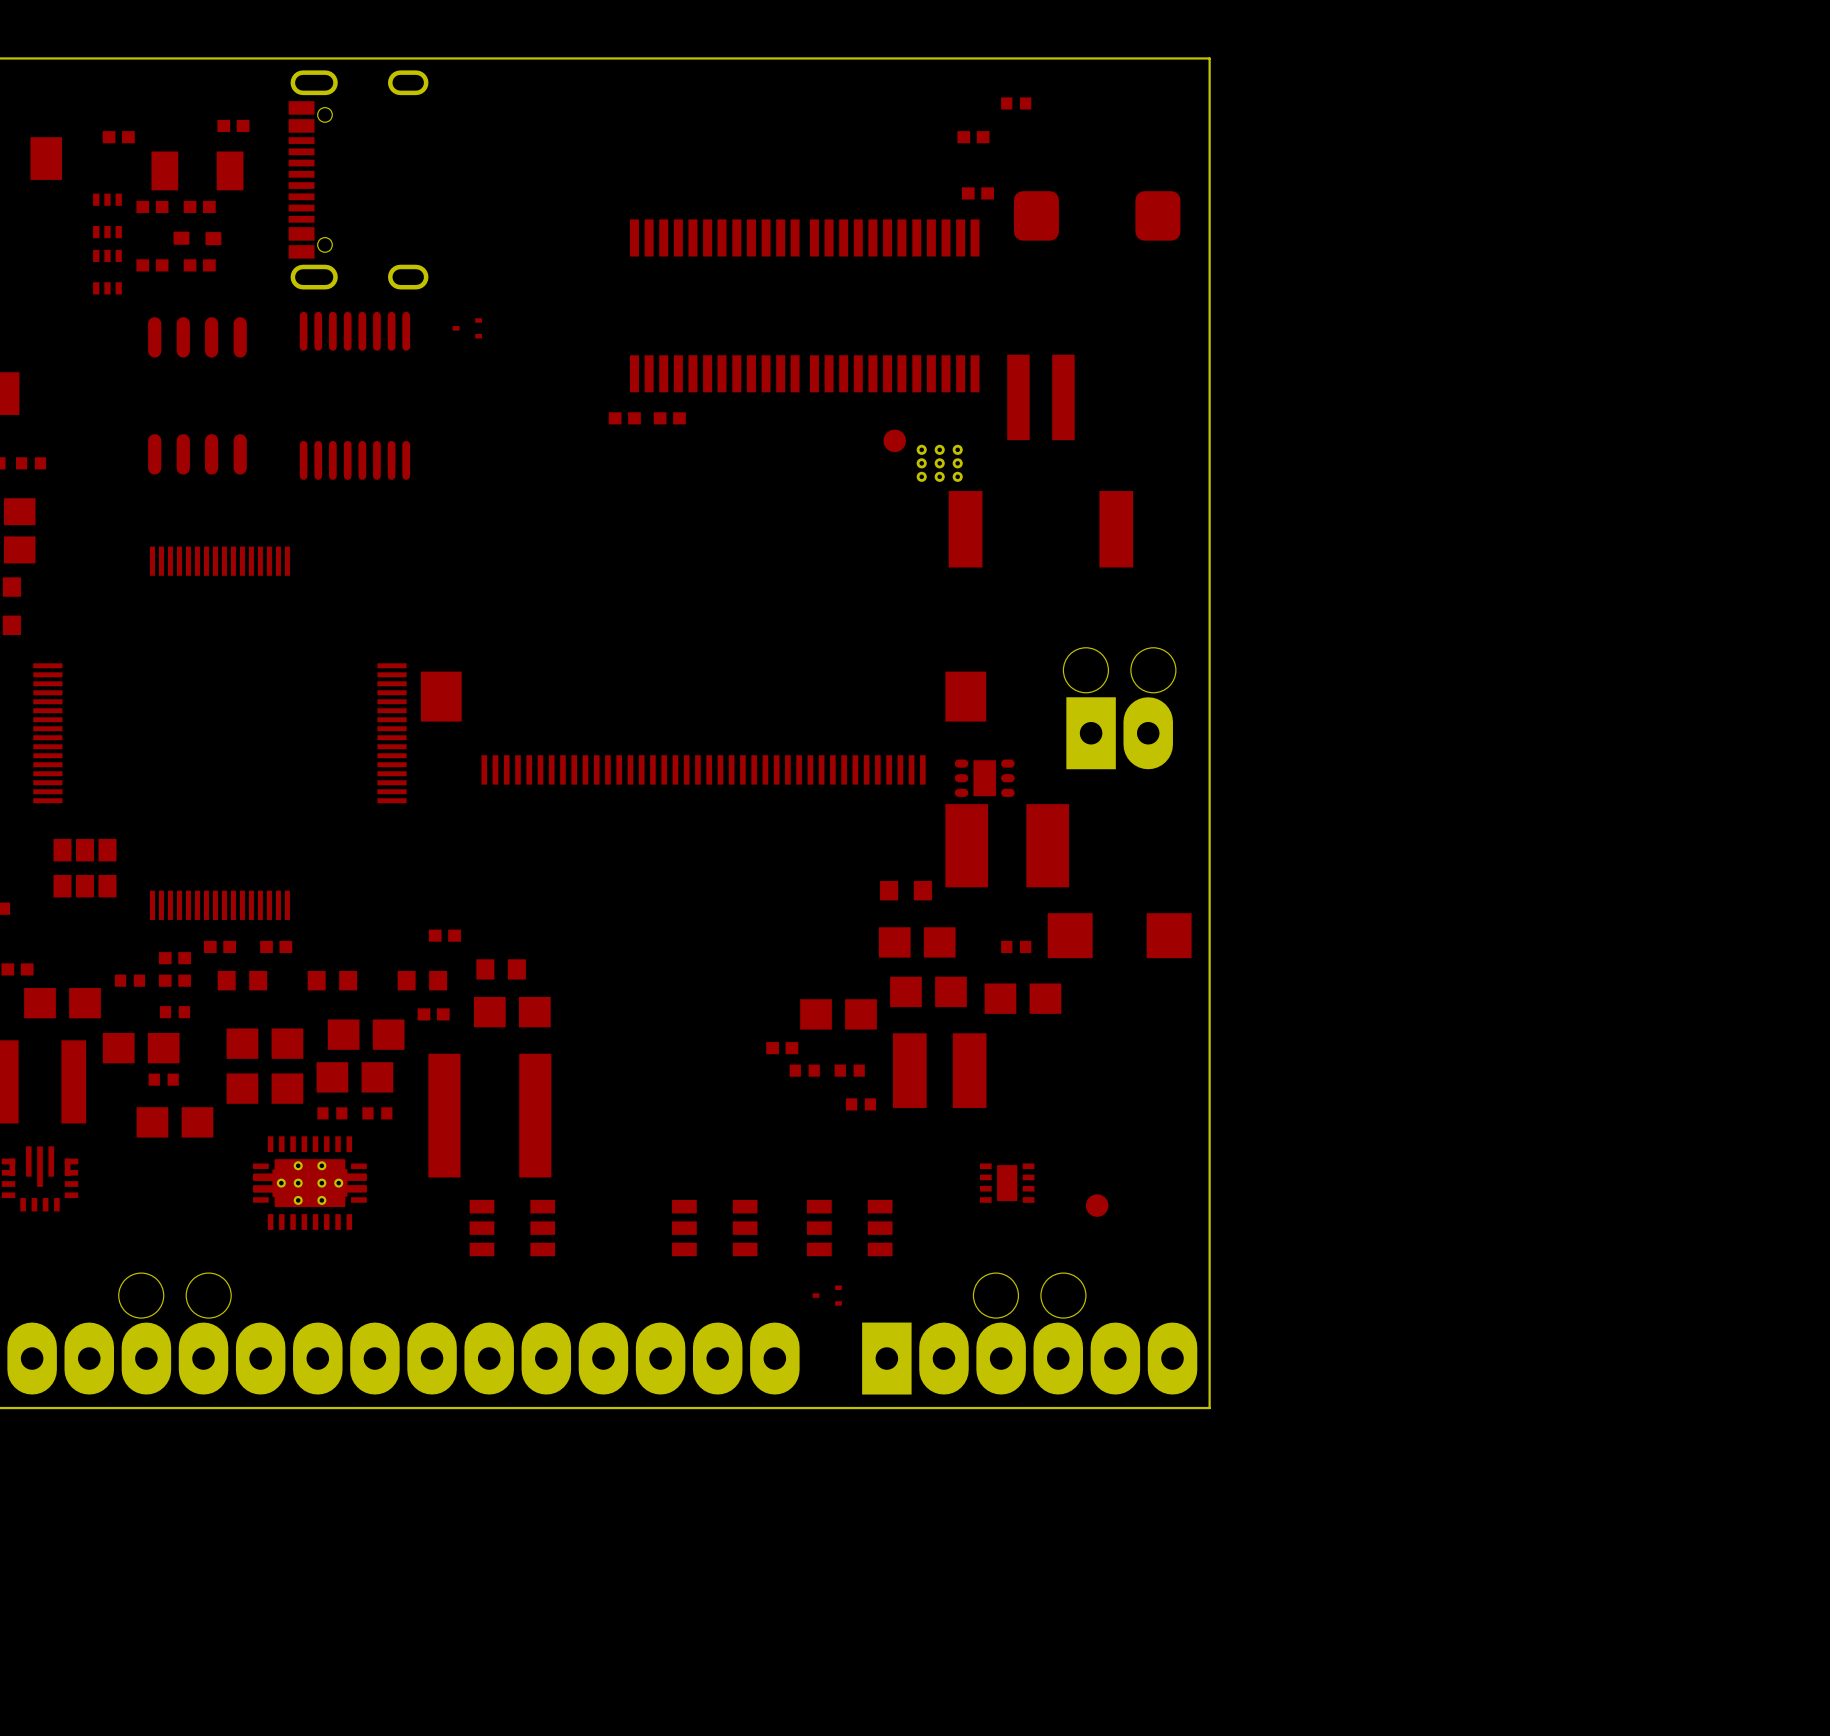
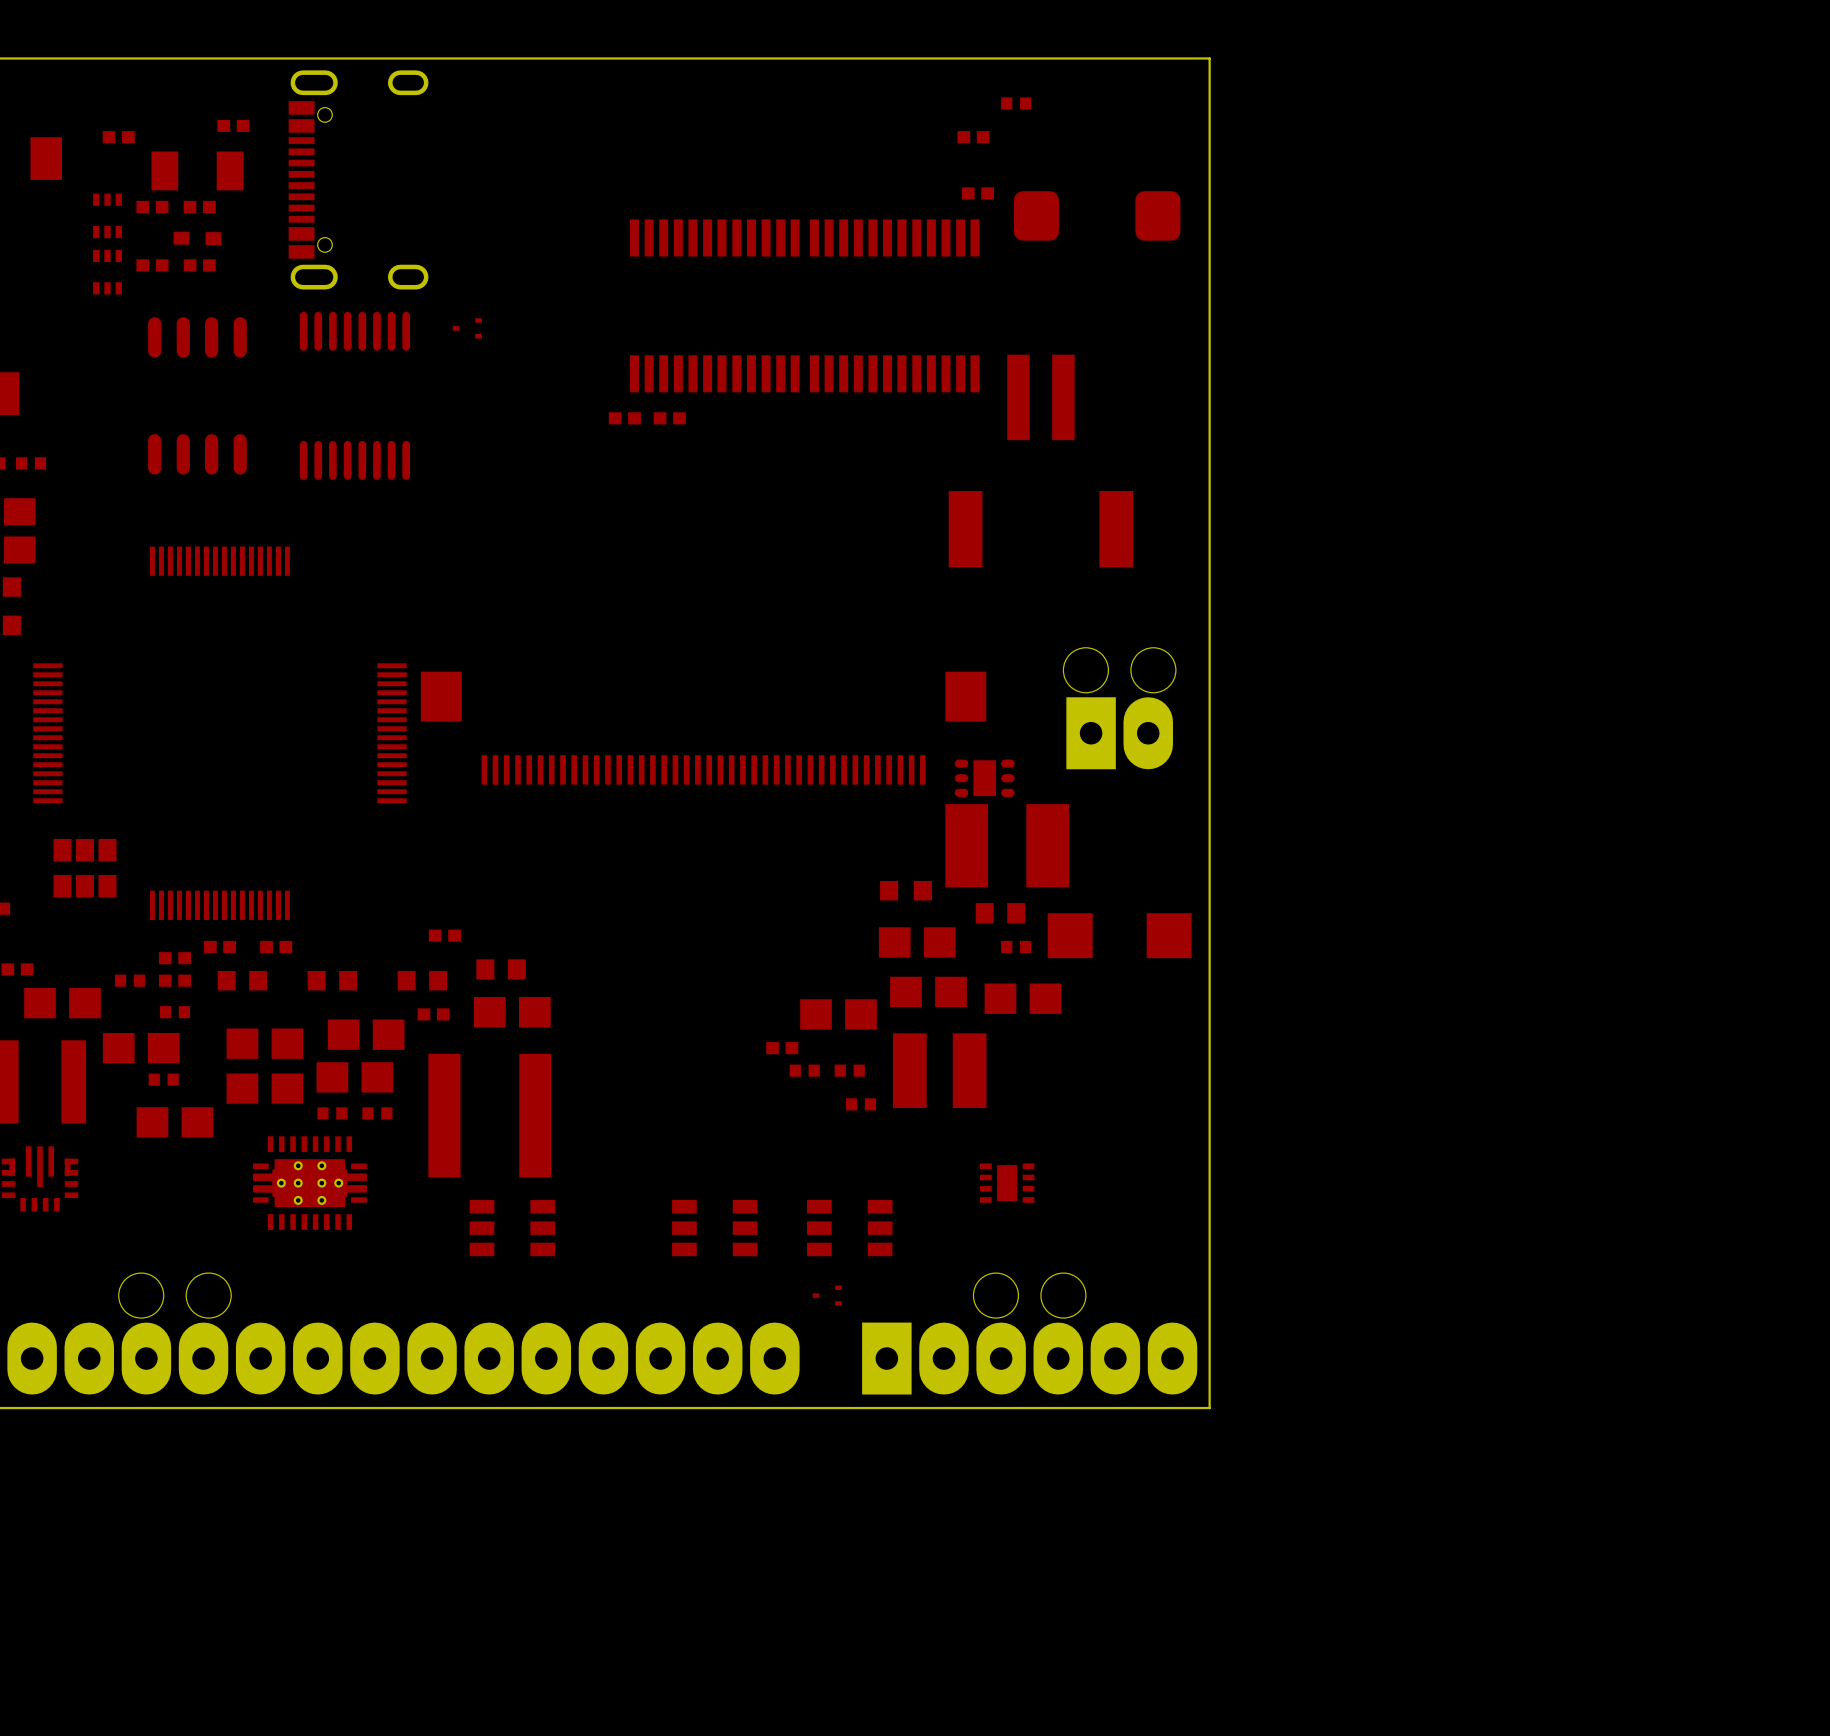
part: (894, 440) -> none
part: (939, 463) -> none
part: none -> (1000, 913)
part: (1097, 1205) -> none

